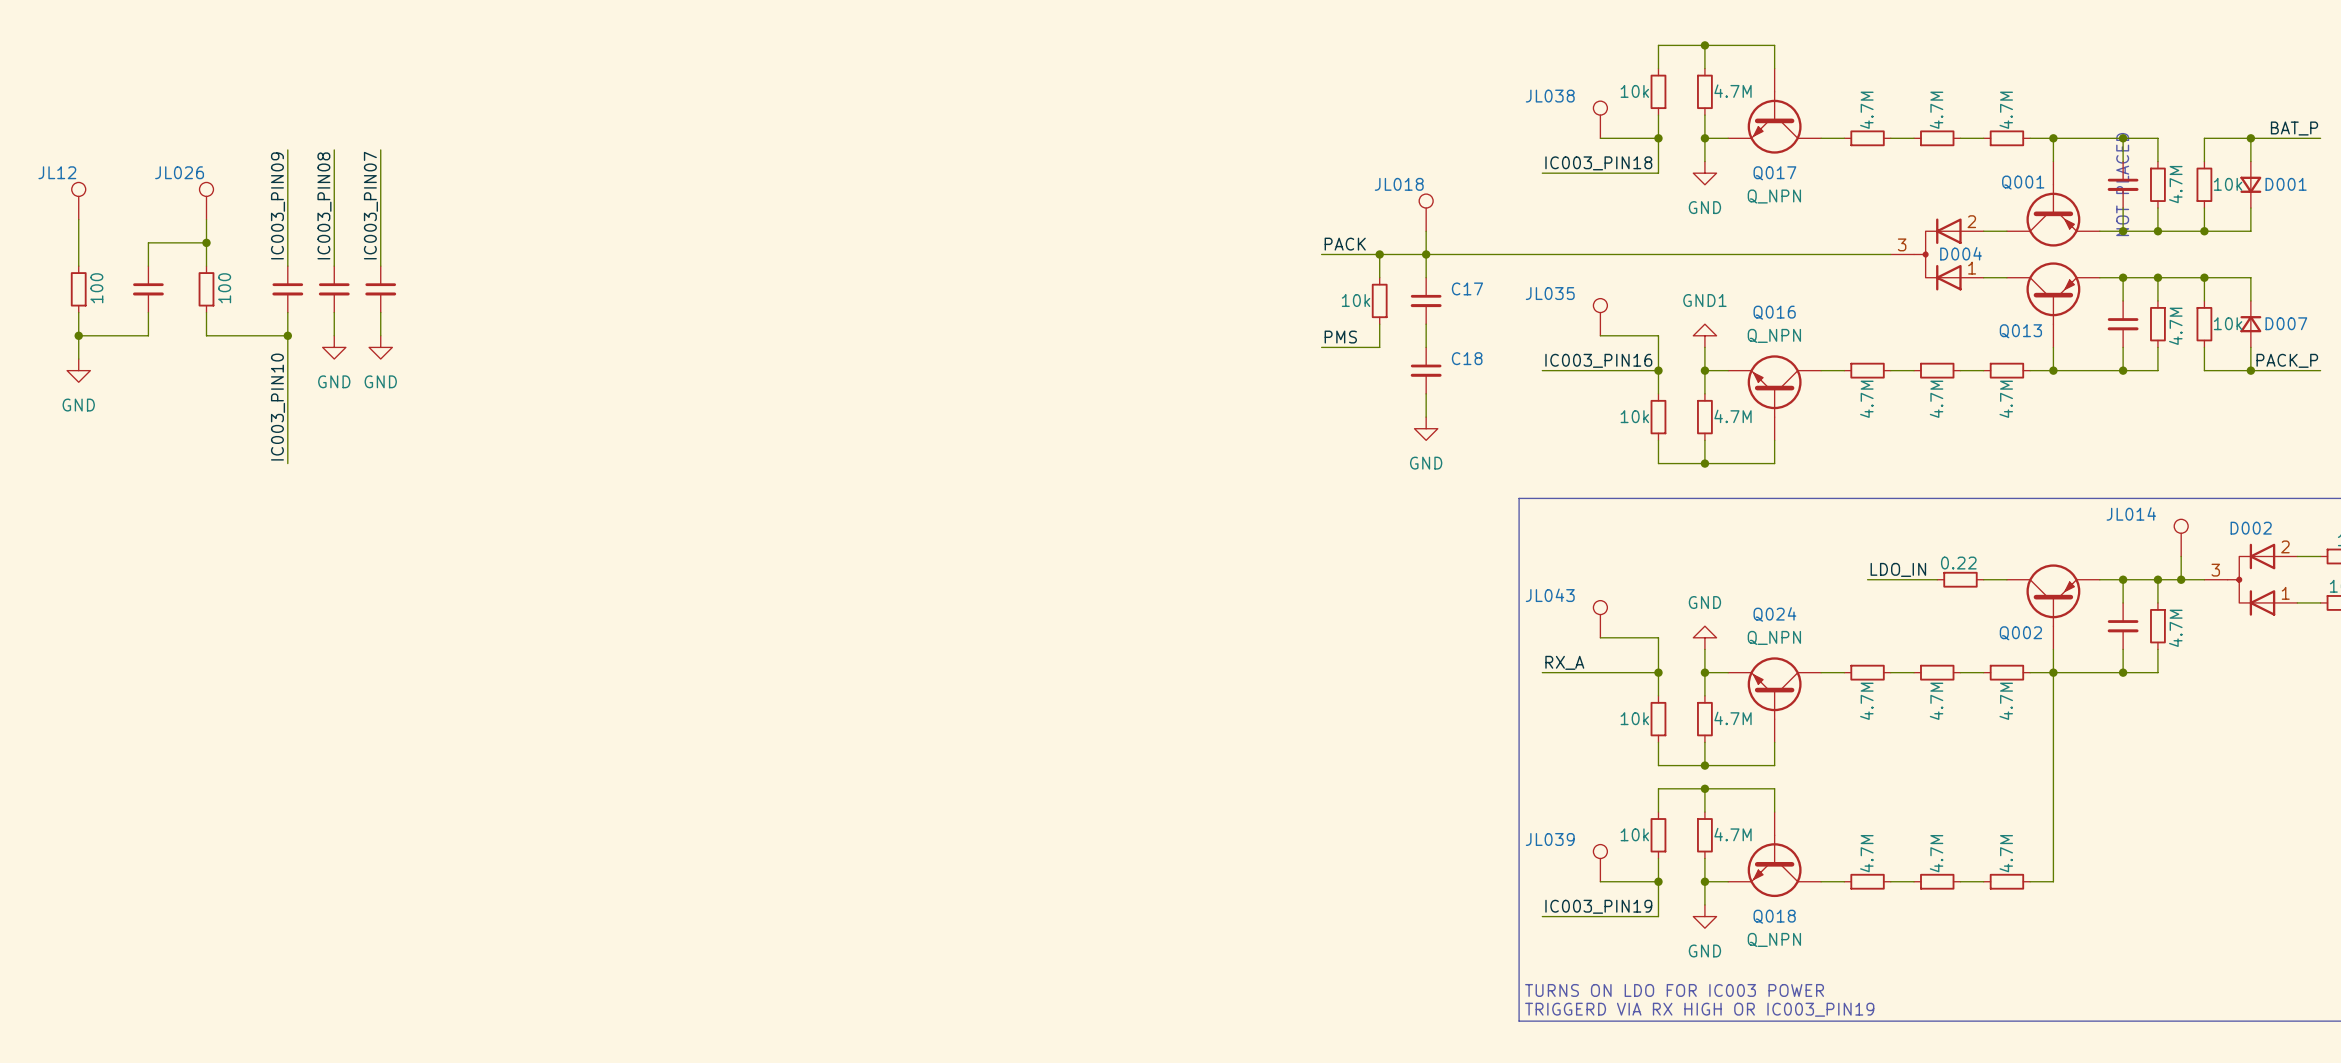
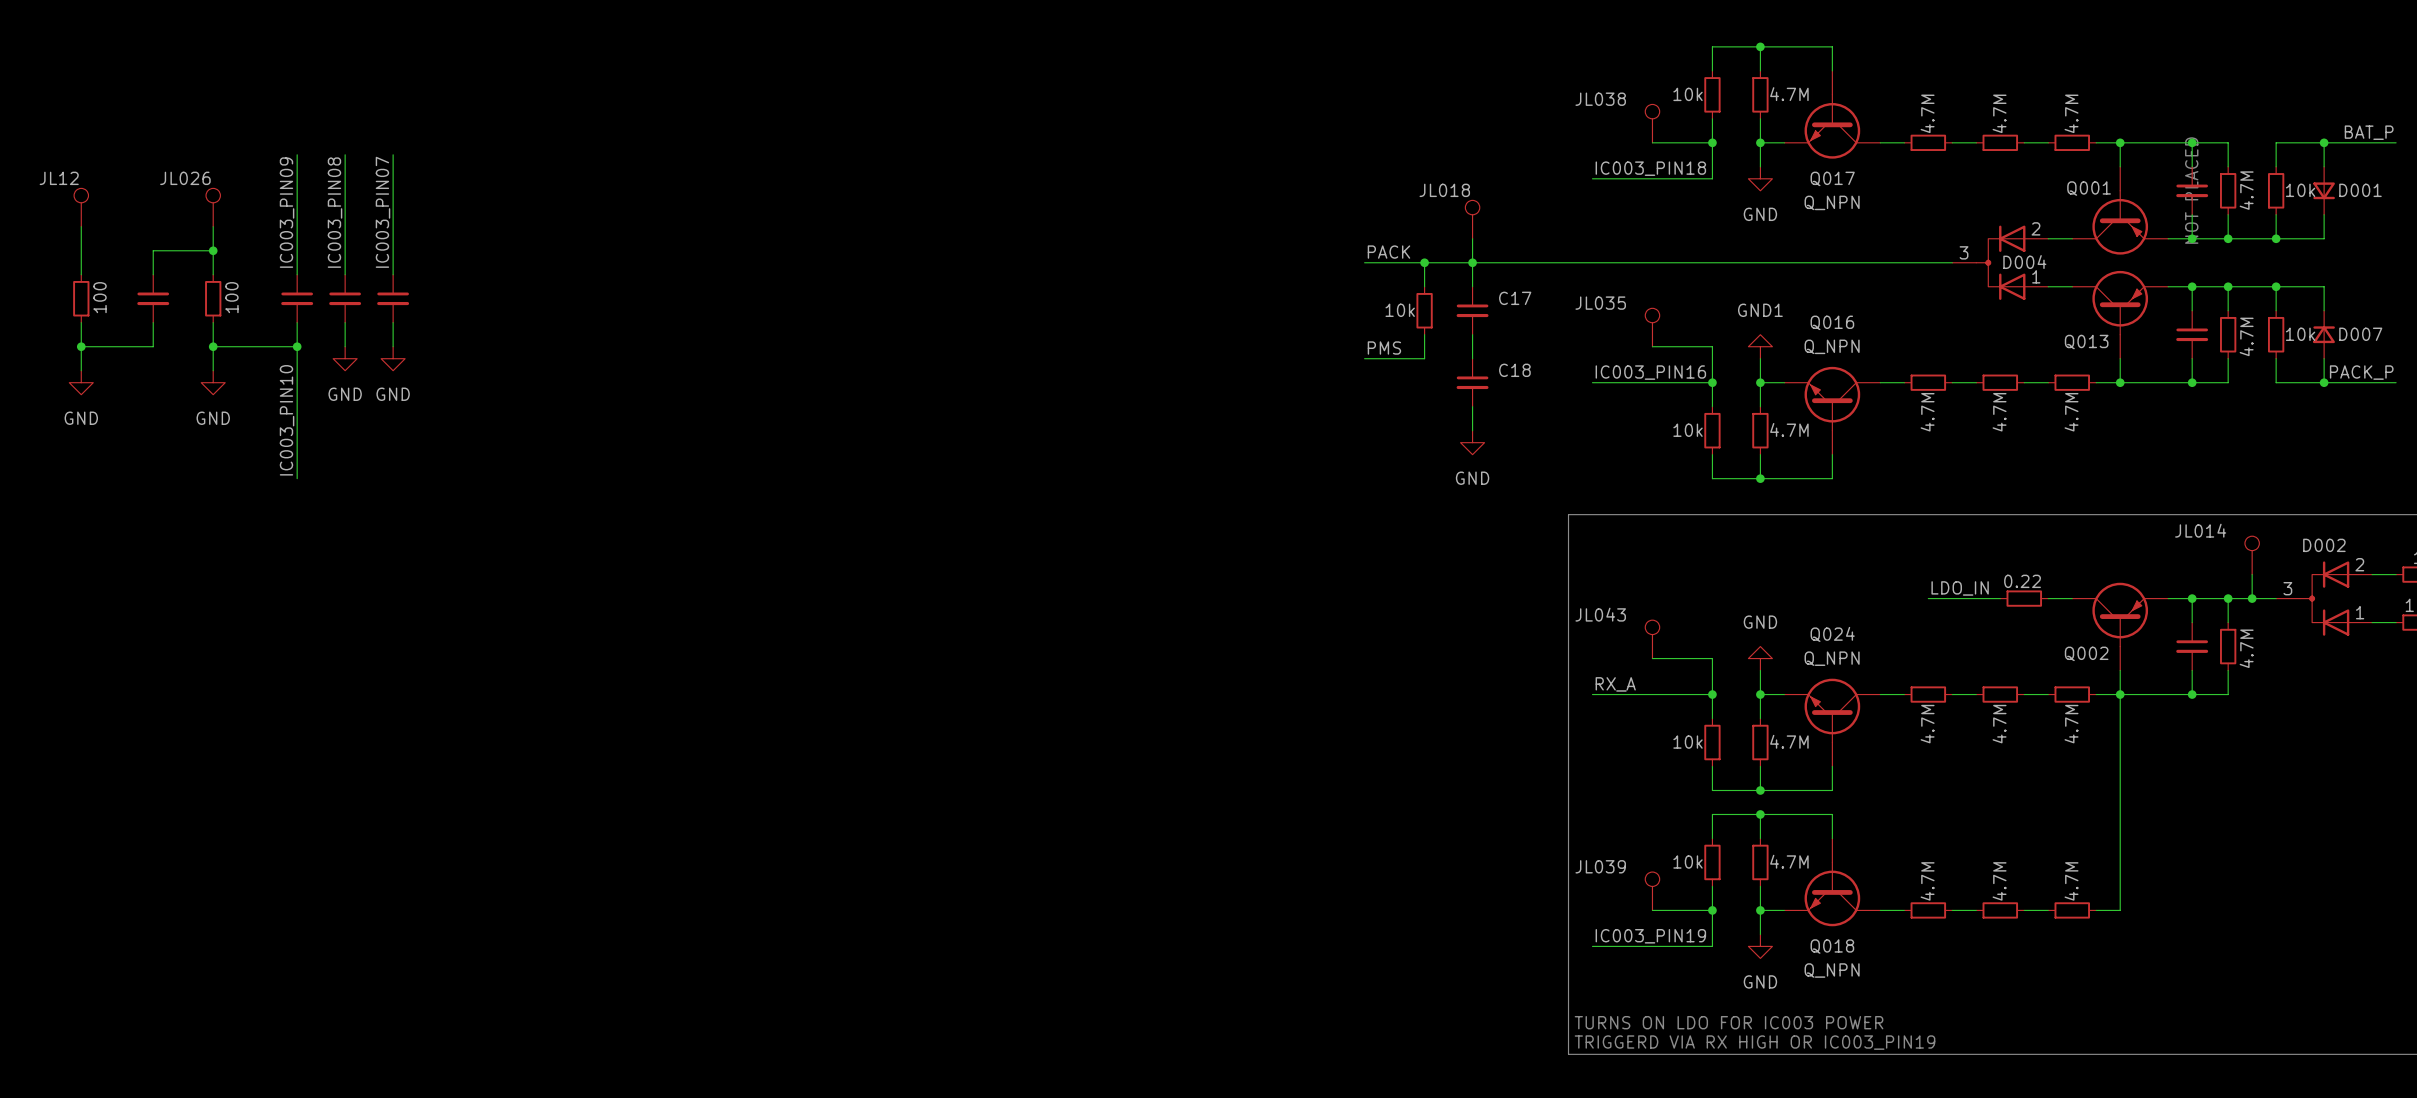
wire: none -> (213, 346) (213, 370)
junction: none -> (213, 346)
power symbol: none -> GND (213, 382)

